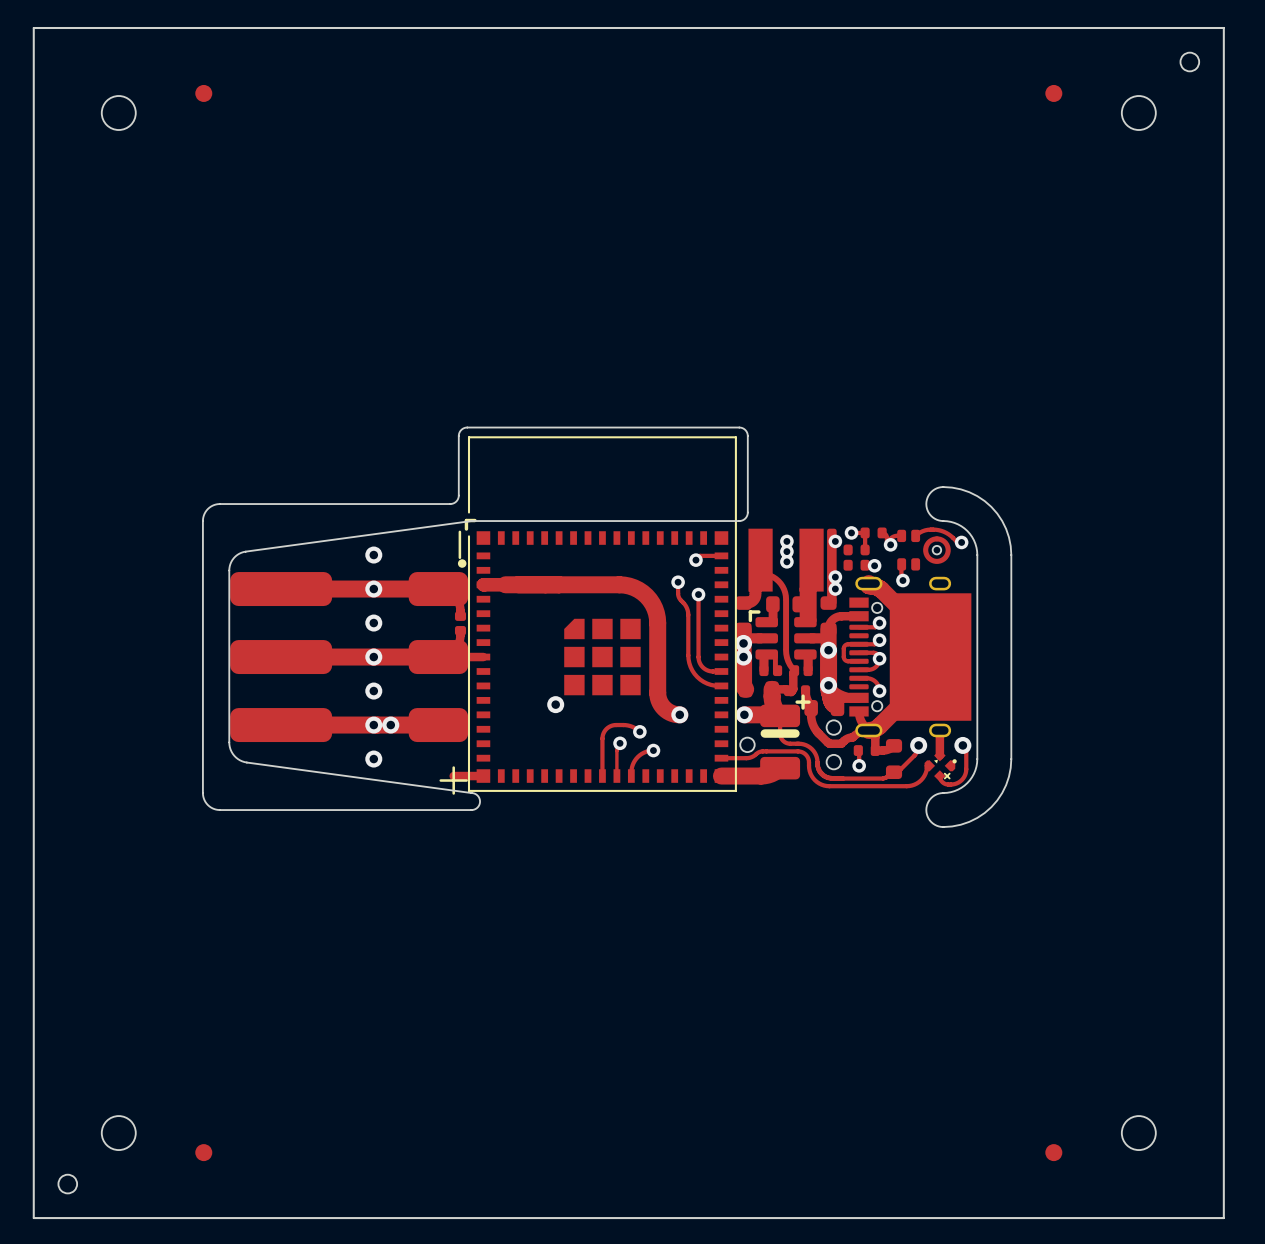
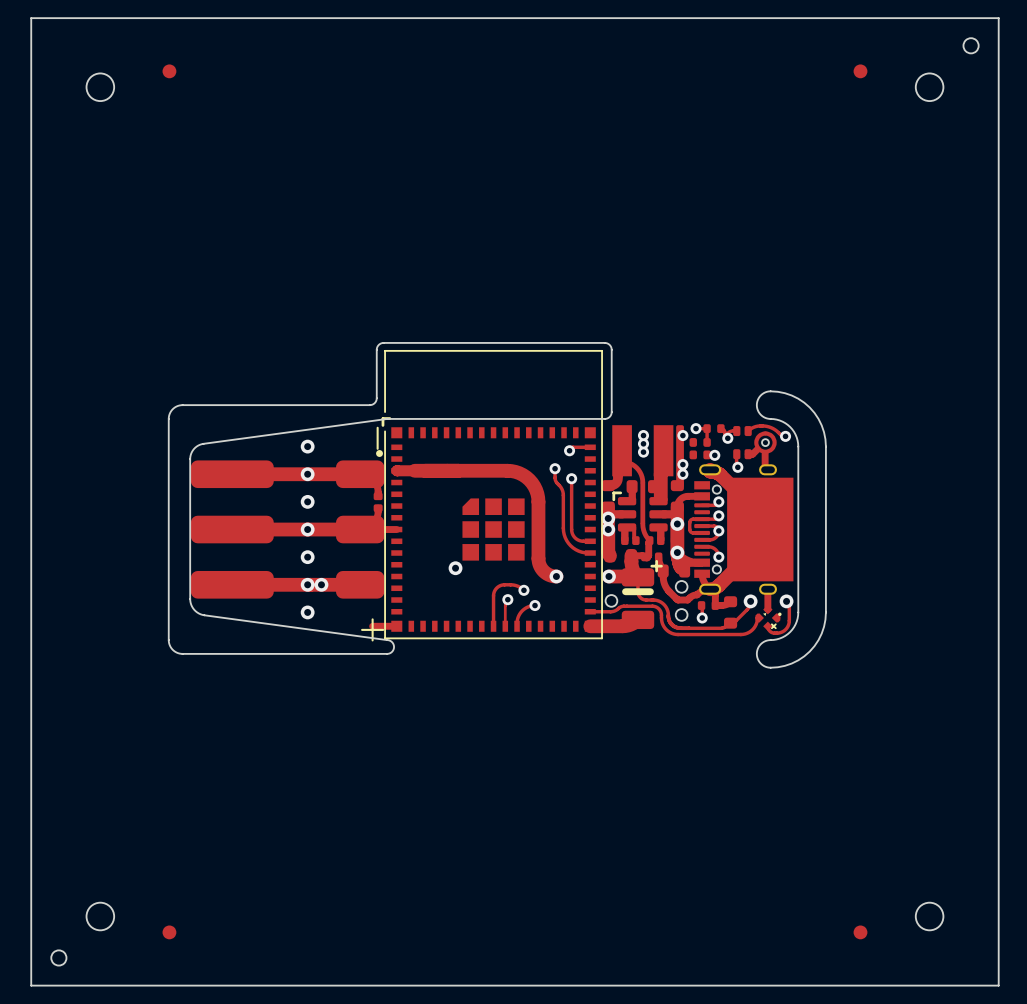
track: none -> (757, 449) (752, 454) (748, 454)
track: none -> (765, 453) (765, 466) (768, 469)

